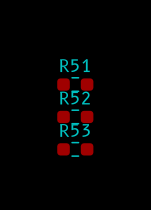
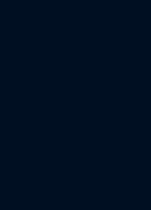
R51: (75, 84) -> none
R52: (75, 116) -> none
R53: (75, 149) -> none

